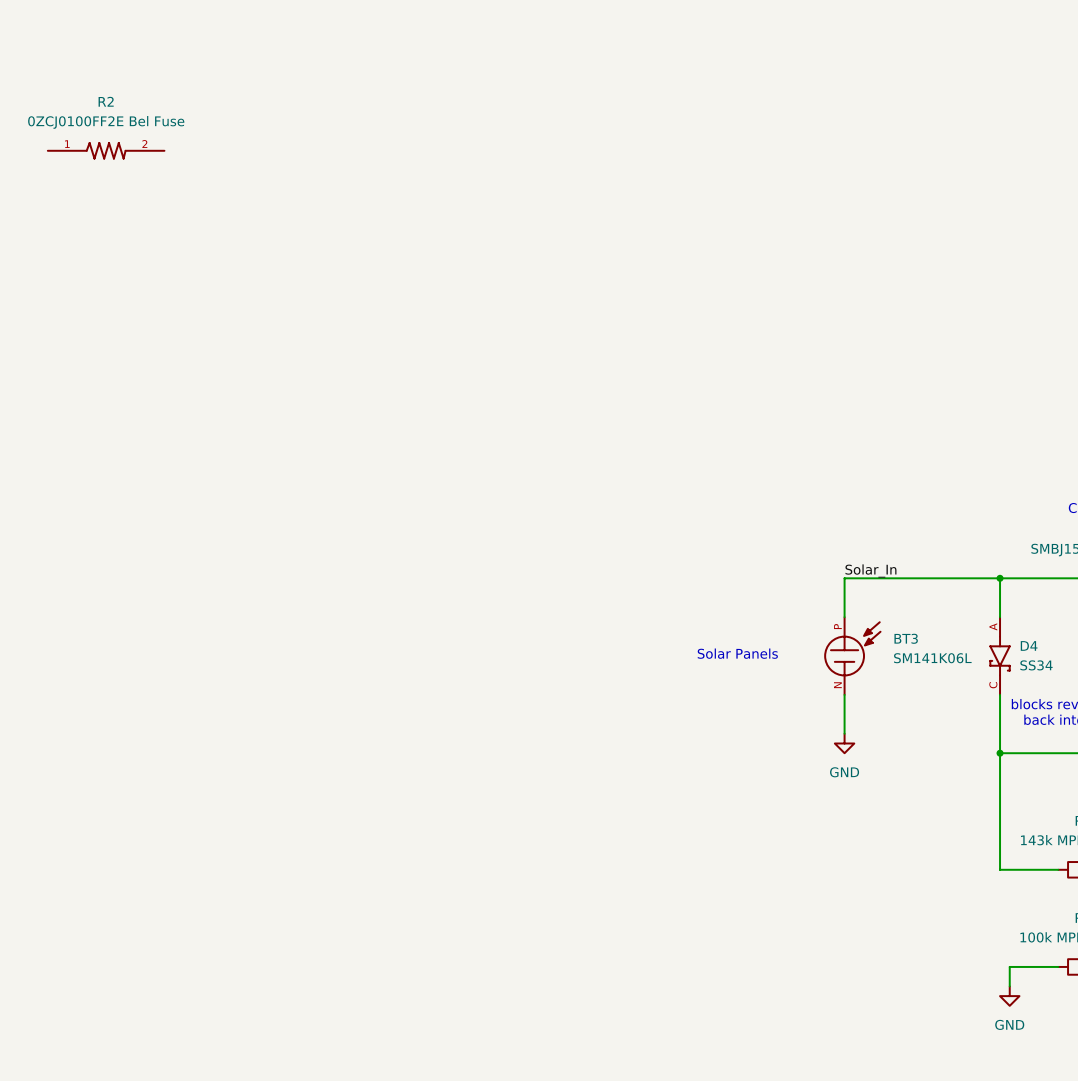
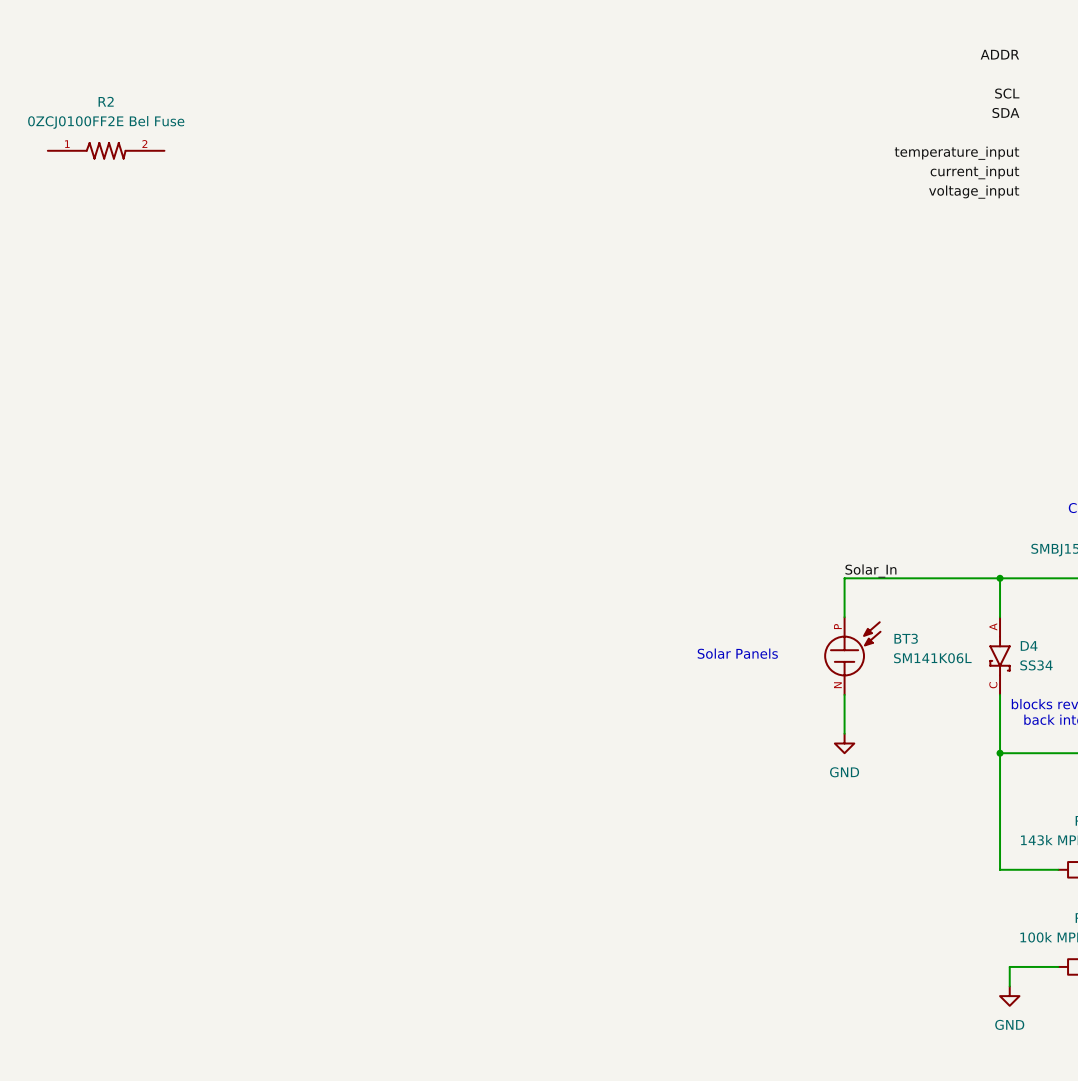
label: none -> ADDR (999, 54)
label: none -> SCL (1007, 93)
label: none -> SDA (1005, 112)
label: none -> temperature_input (956, 153)
label: none -> current_input (974, 172)
label: none -> voltage_input (974, 192)

